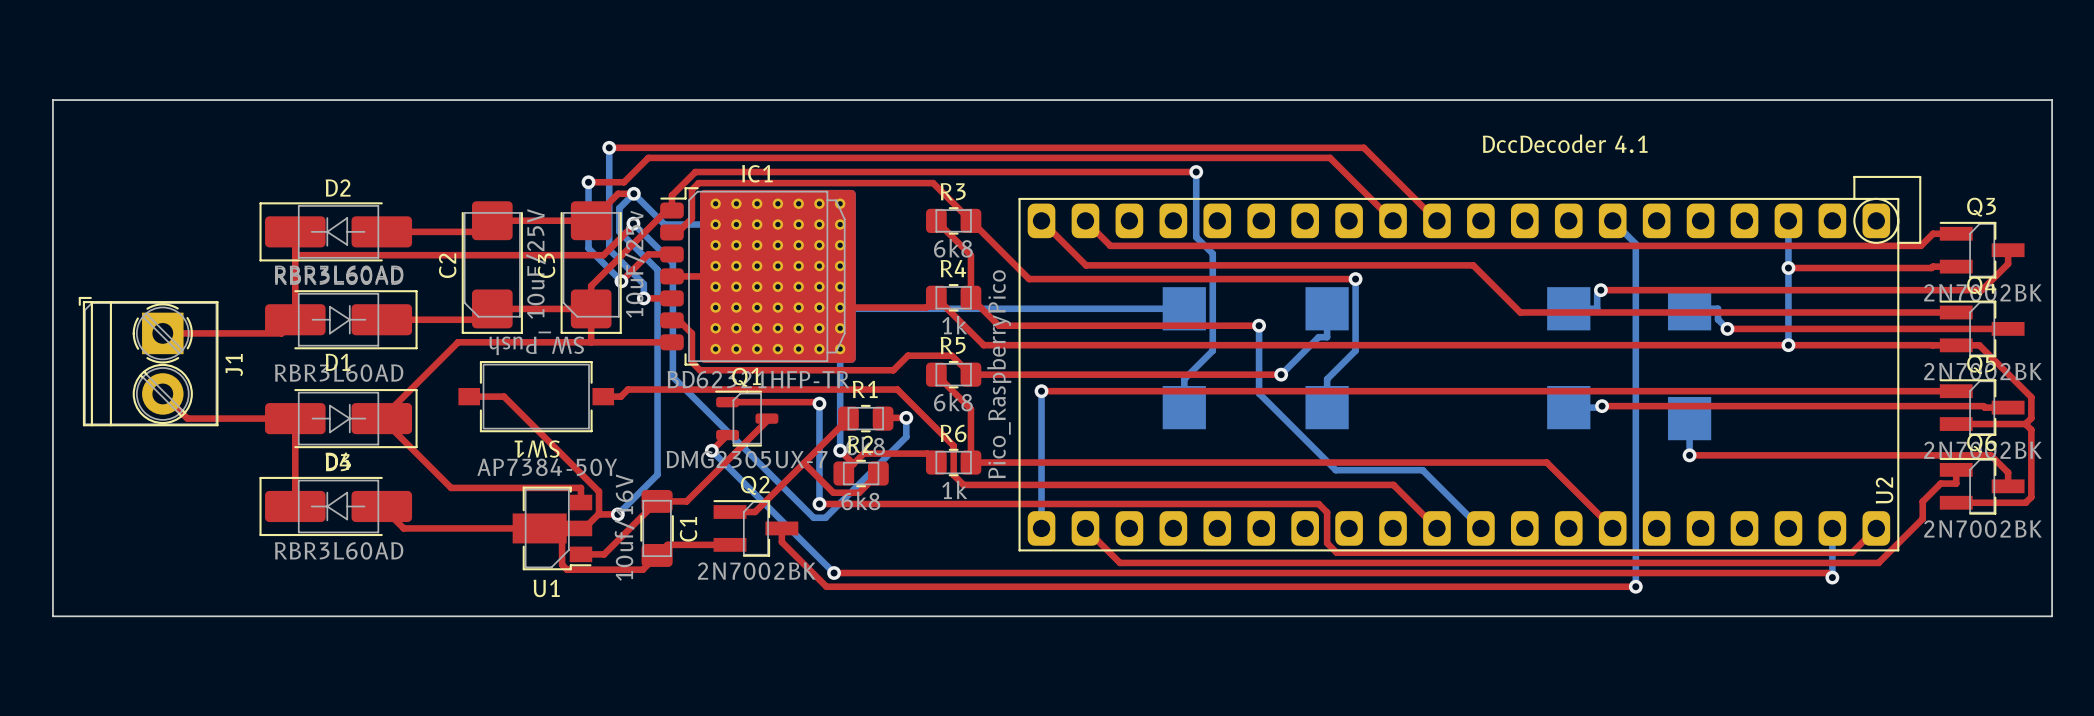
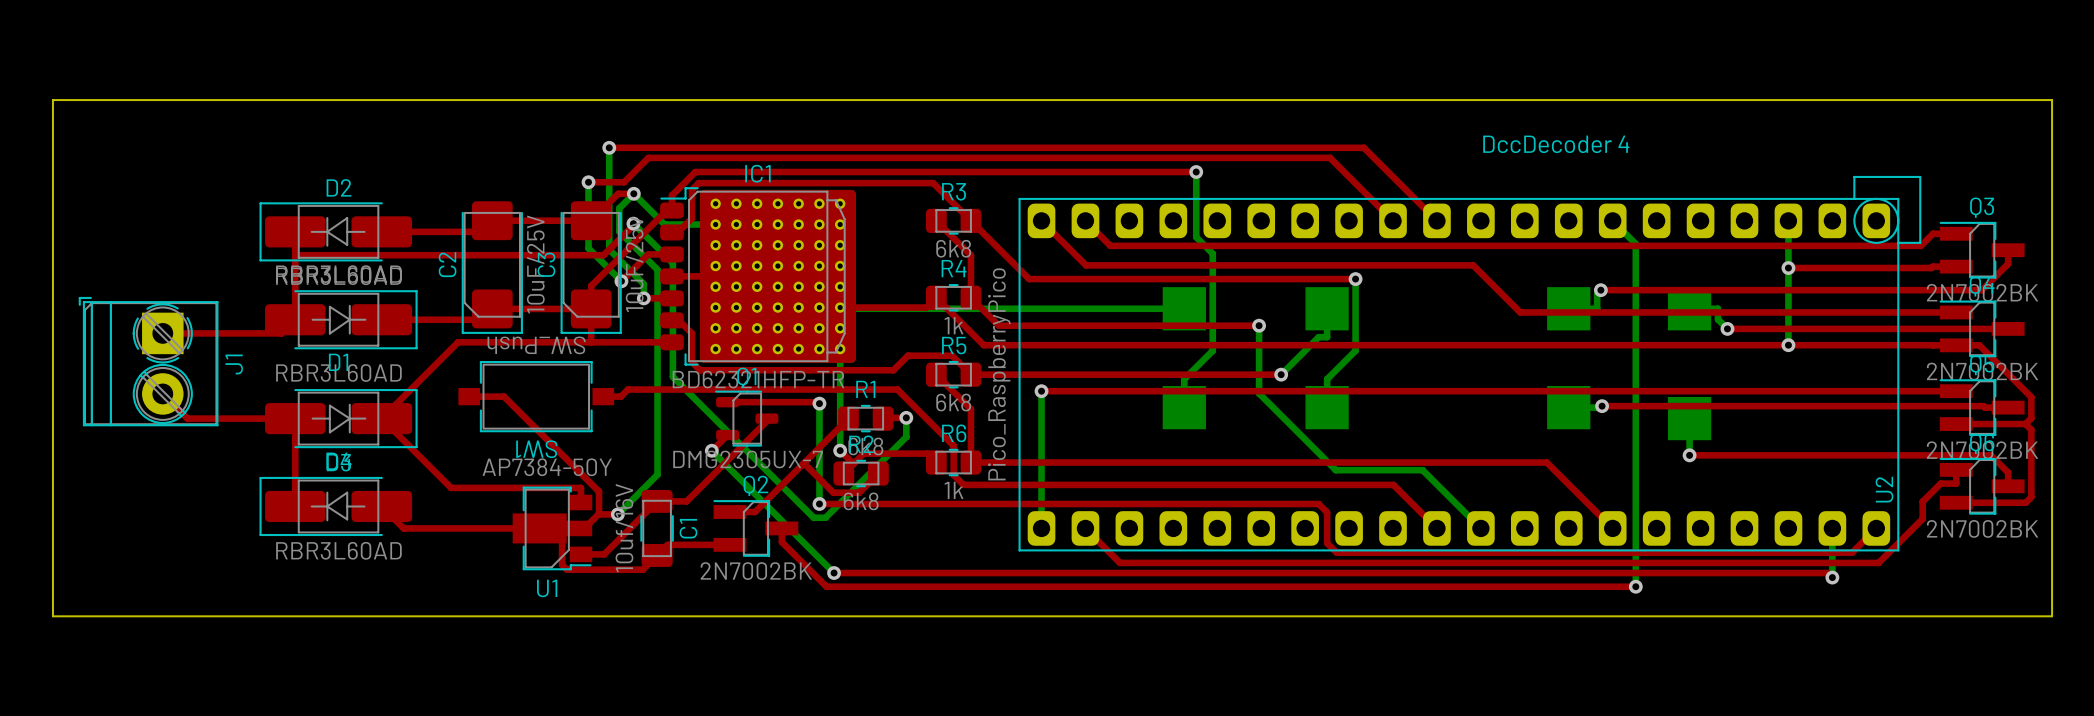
text: DccDecoder 4.1 (1565, 143) -> DccDecoder 4 (1556, 144)

